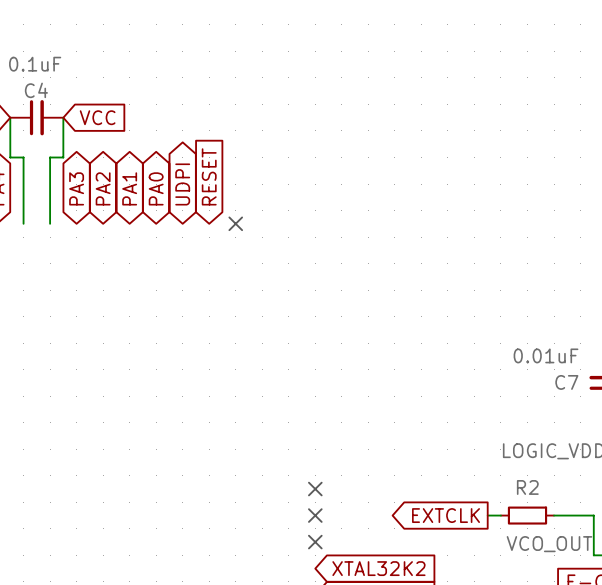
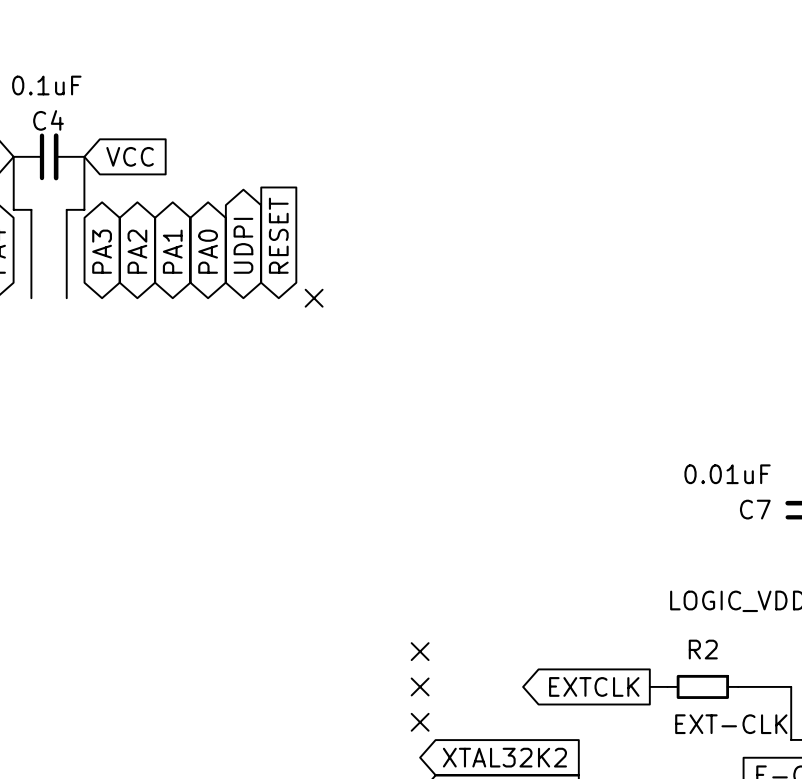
label: VCO_OUT (549, 544) -> EXT-CLK (731, 724)

